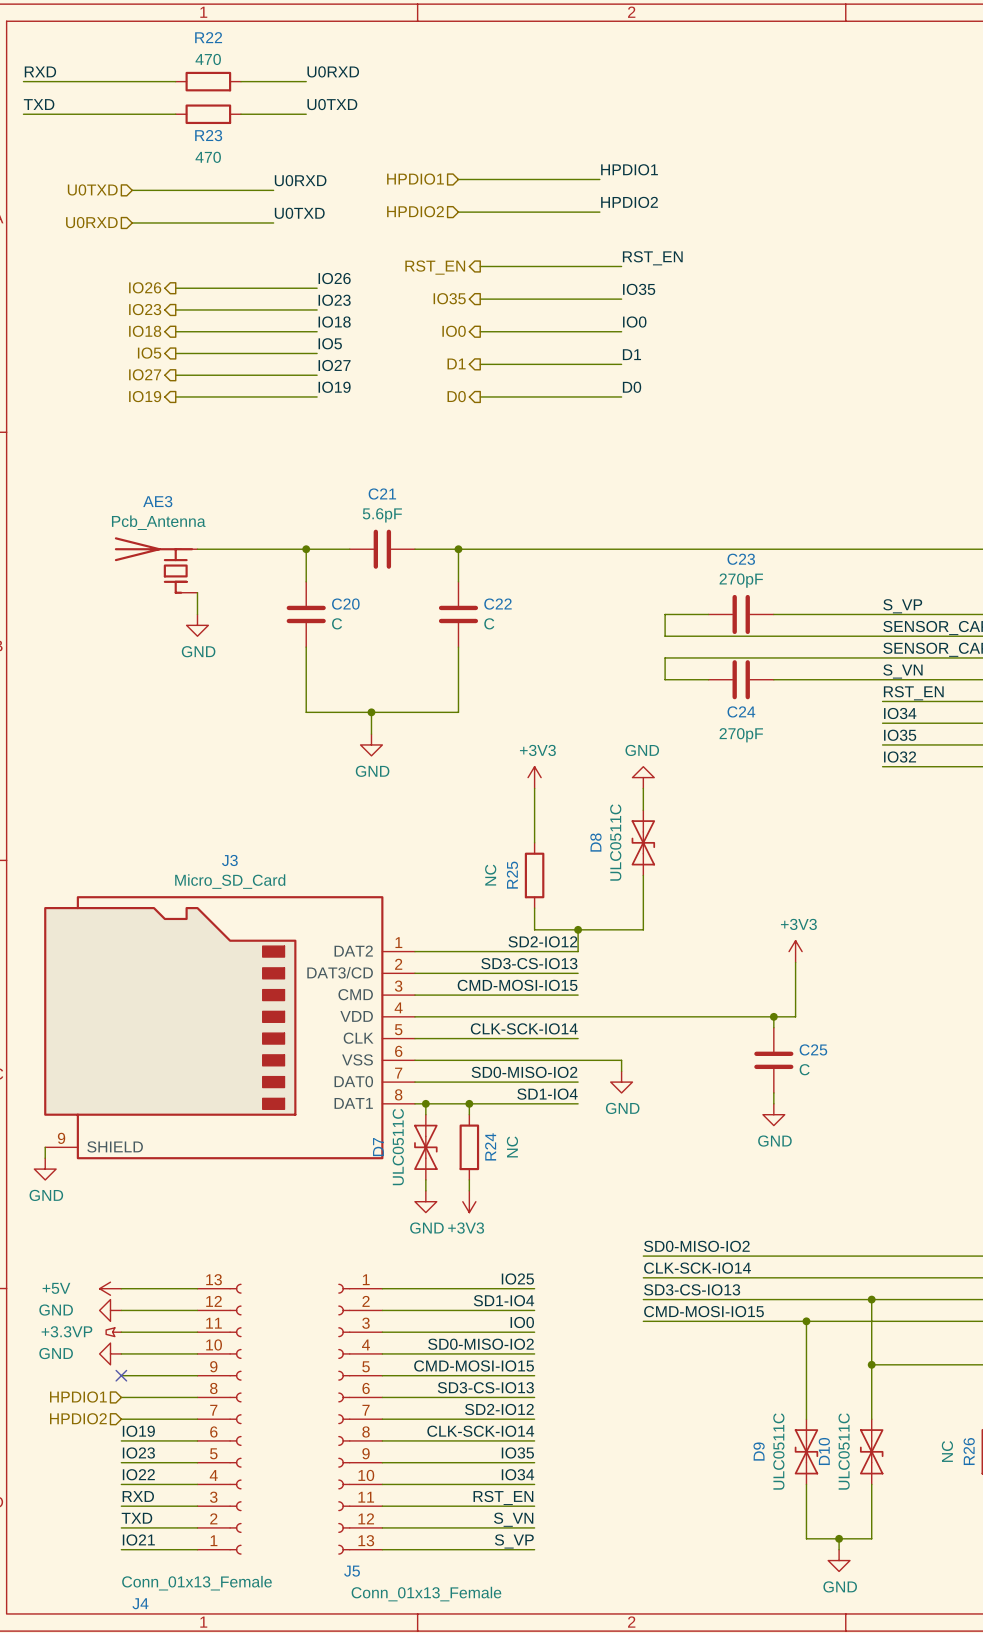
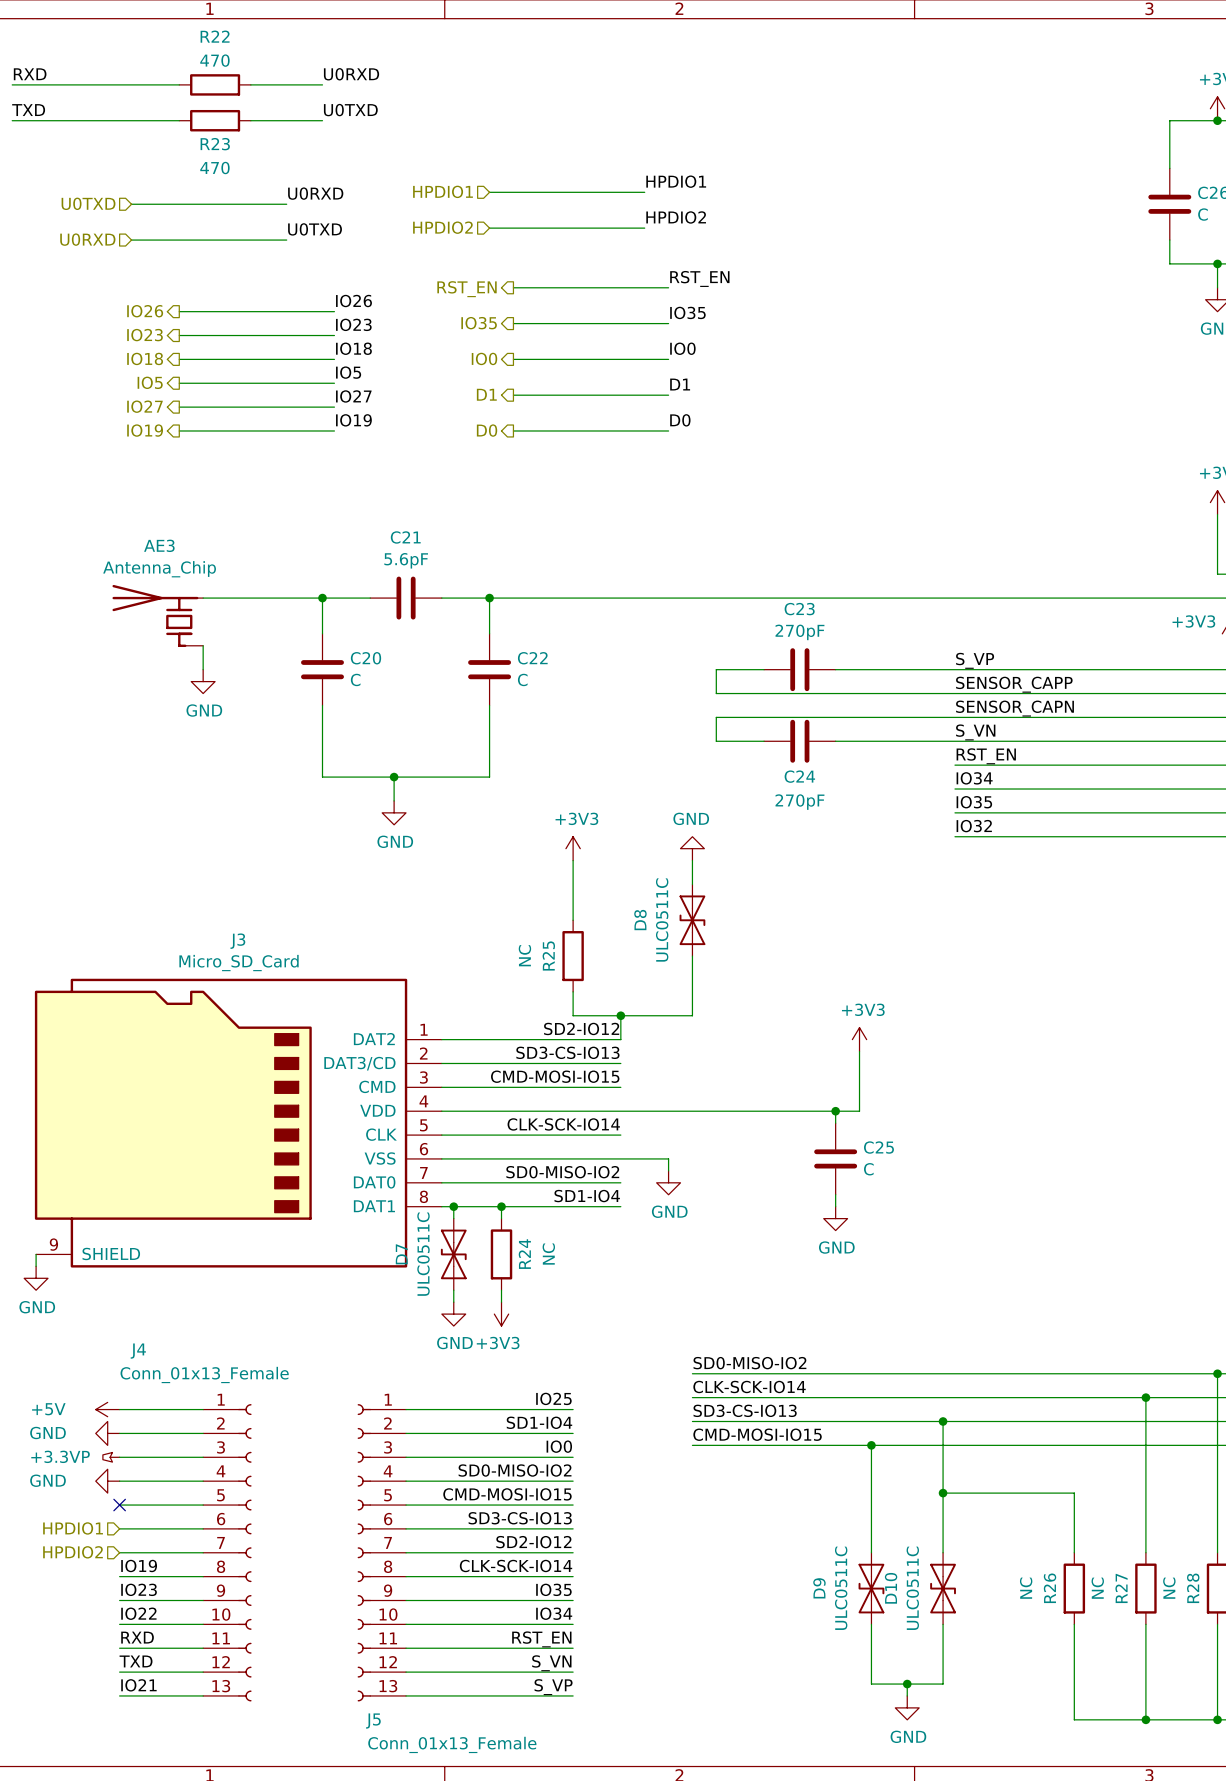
AE3 value: Pcb_Antenna (158, 522) -> Antenna_Chip (159, 569)
J4 flip: as is (235, 1419) -> up-down (244, 1552)

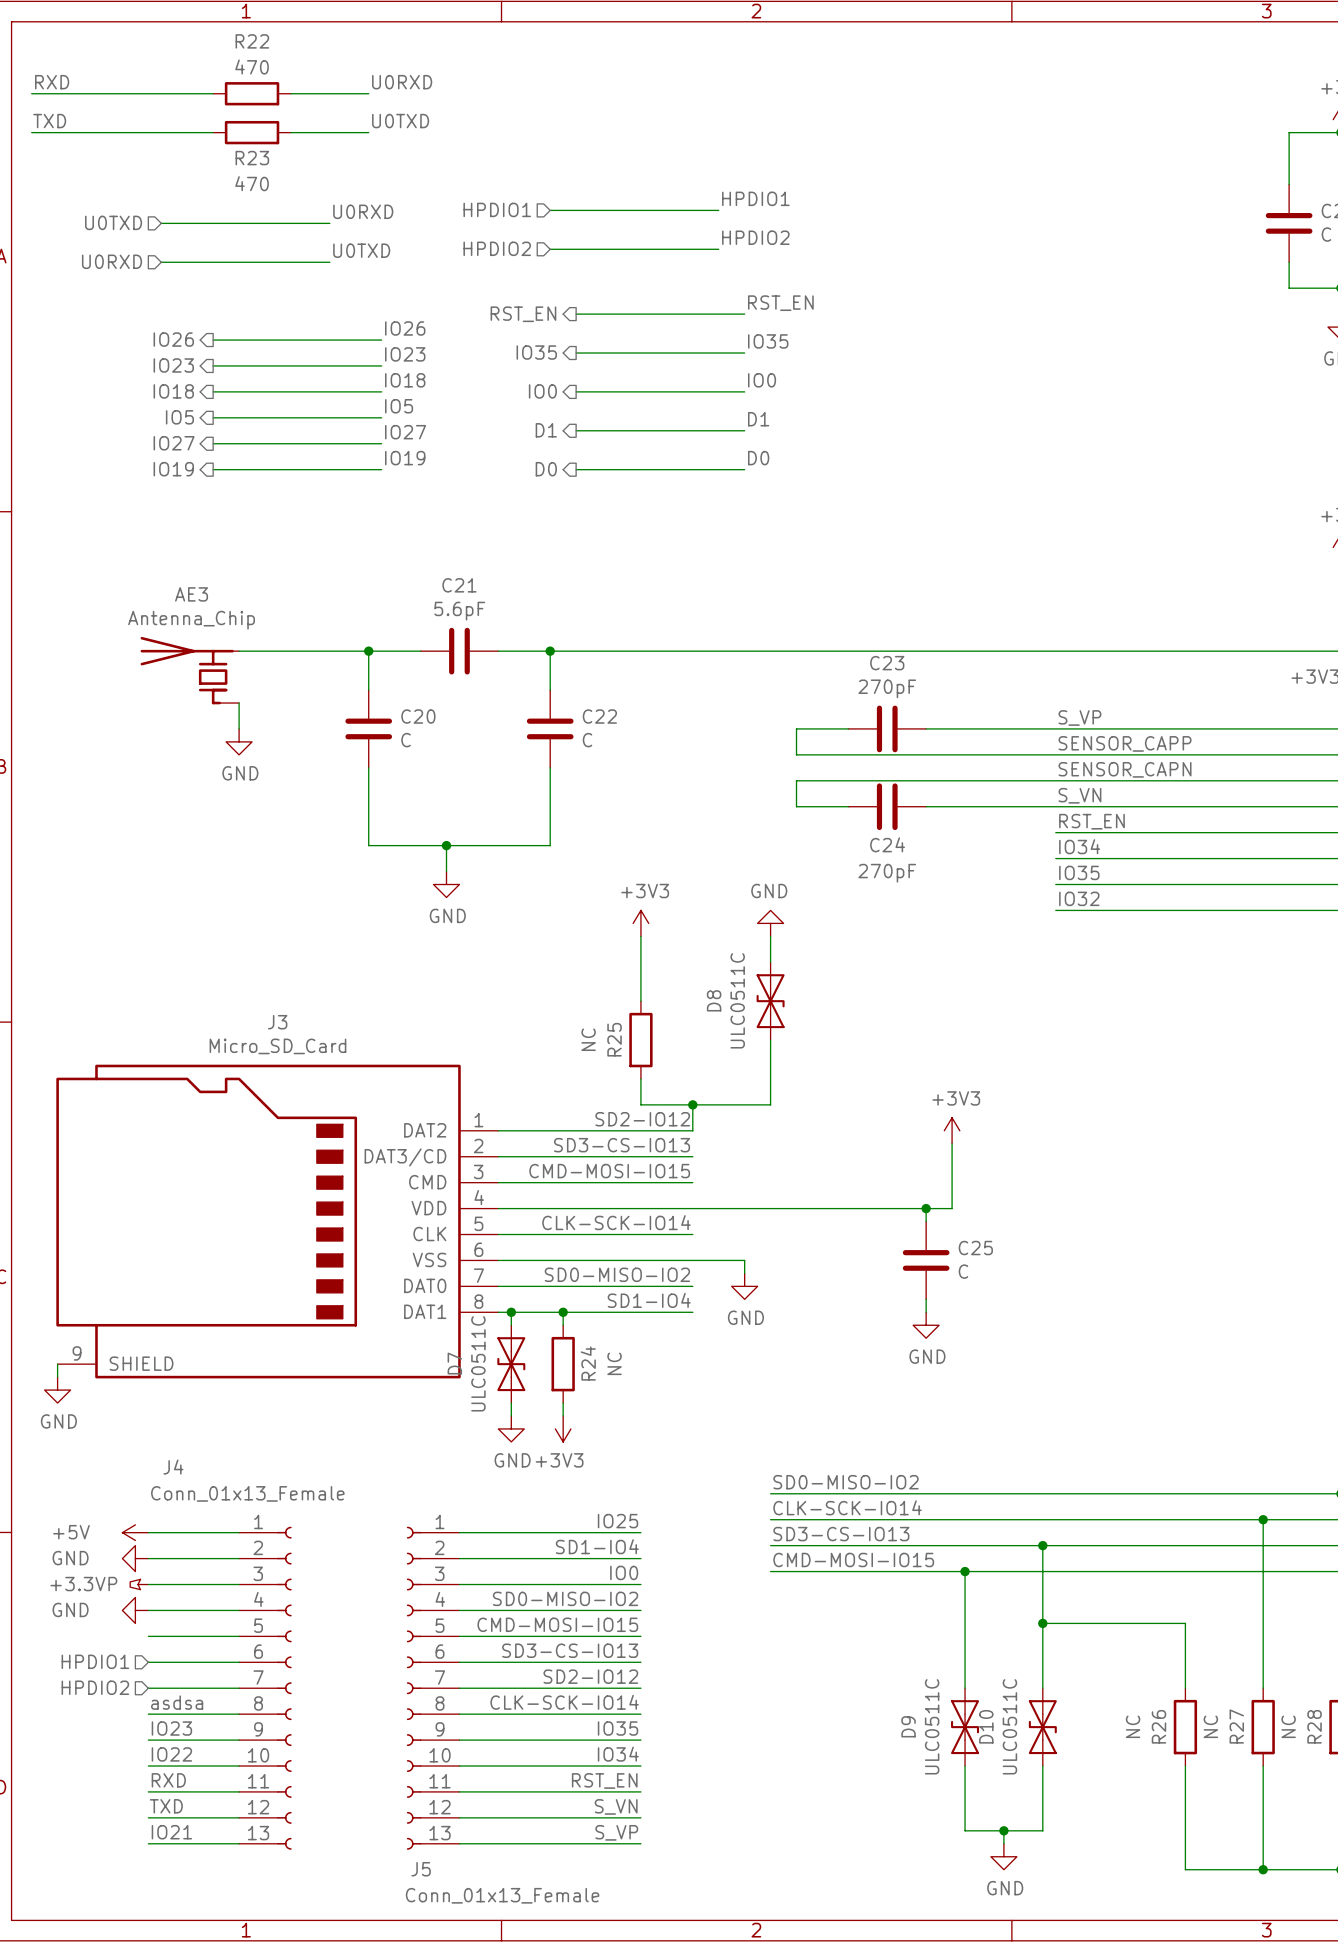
no-connect mark: (119, 1505) -> none
label: IO19 (139, 1565) -> asdsa (177, 1702)

